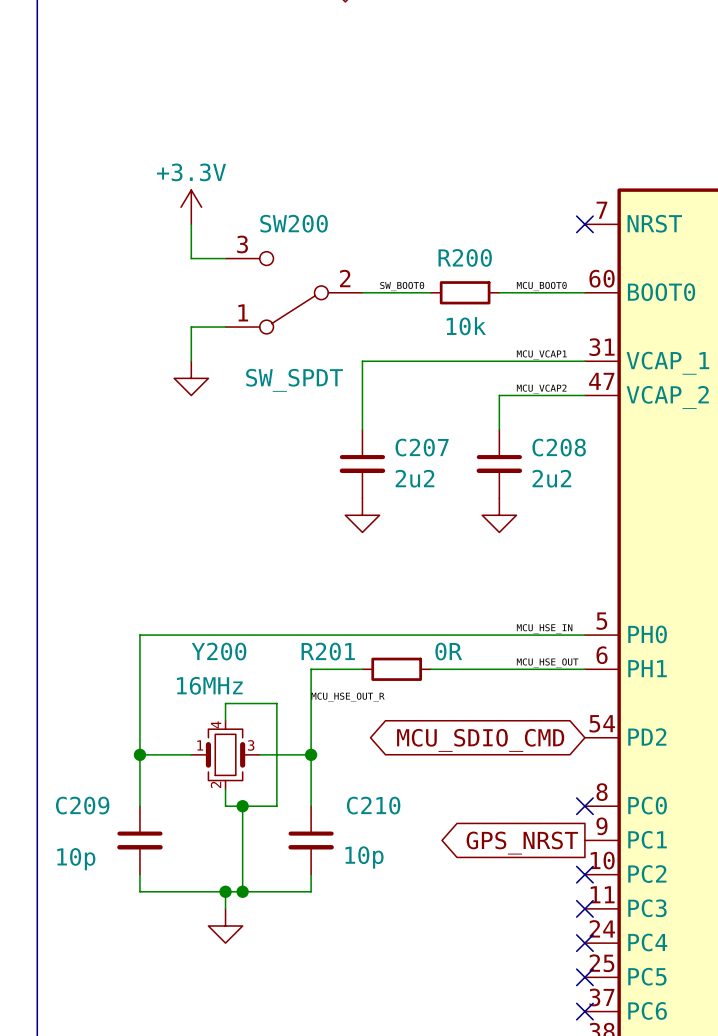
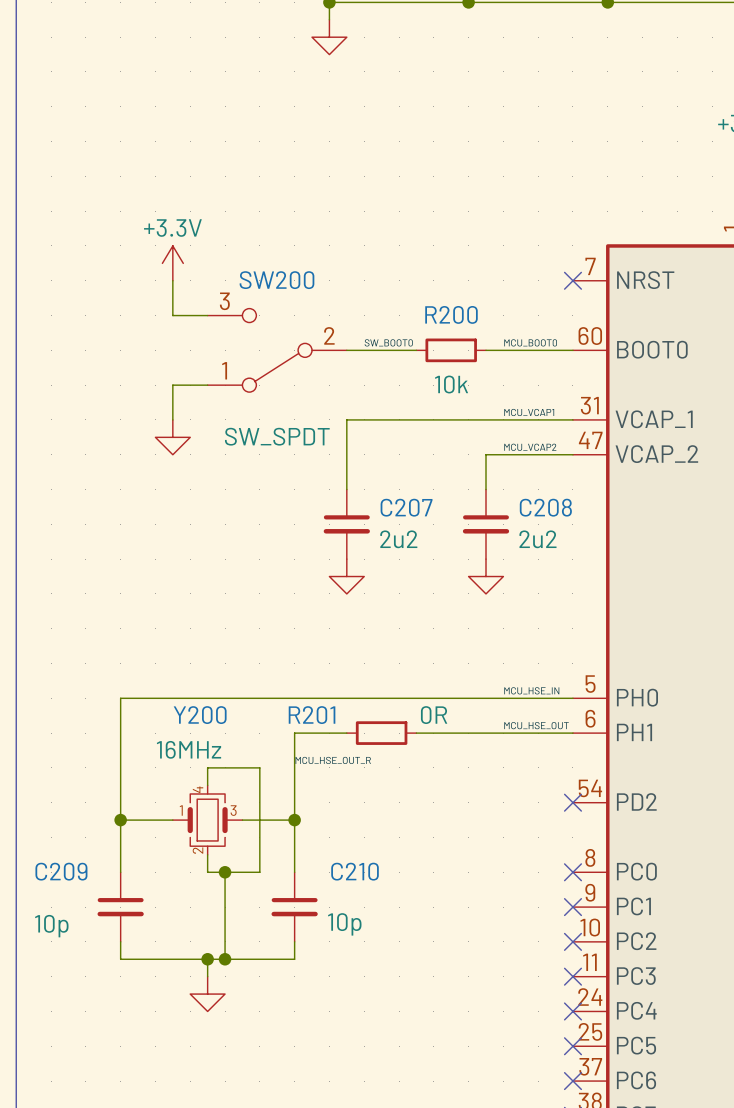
no-connect mark: none -> (572, 802)
global label: MCU_SDIO_CMD (480, 740) -> none
no-connect mark: none -> (572, 907)
global label: GPS_NRST (522, 843) -> none

